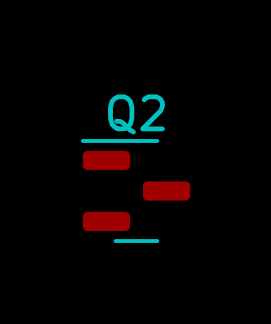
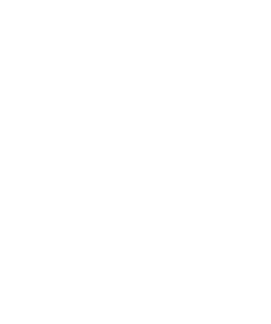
Q2: (135, 190) -> none

